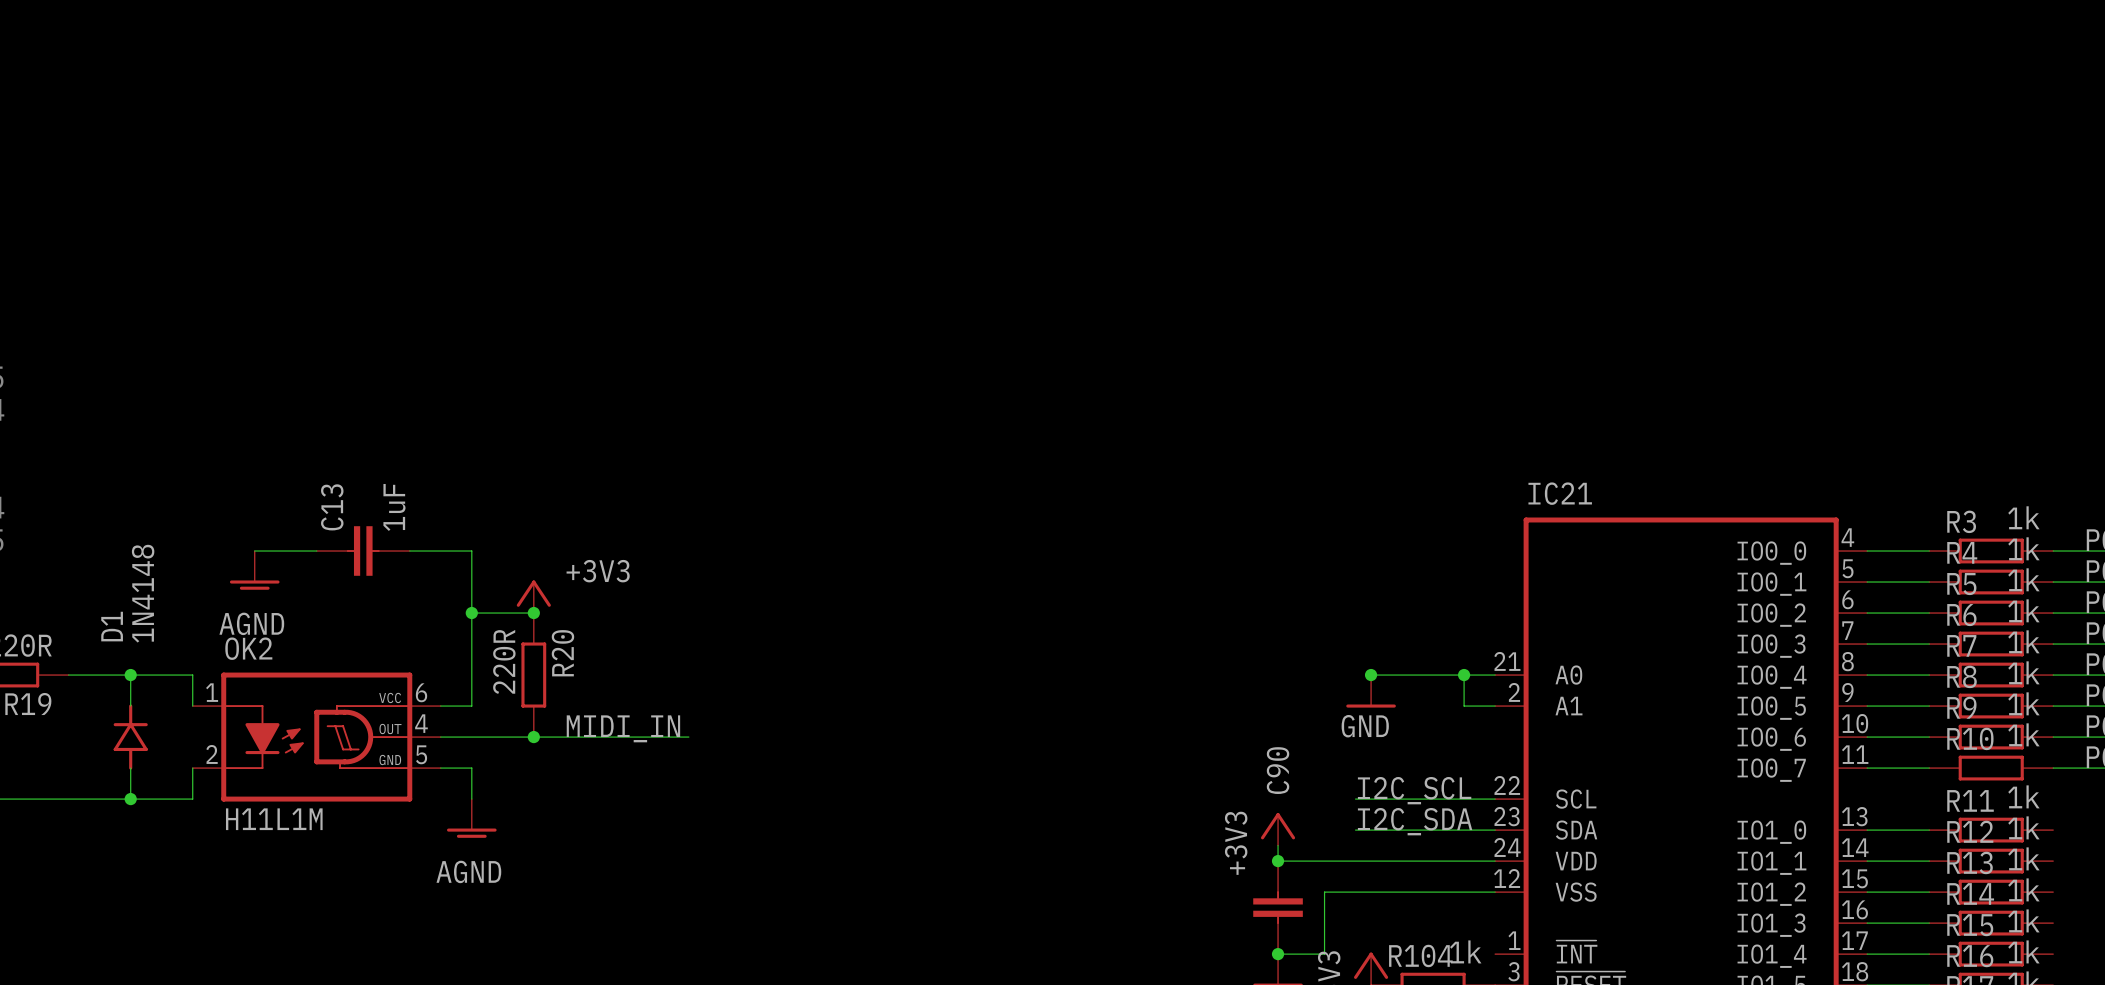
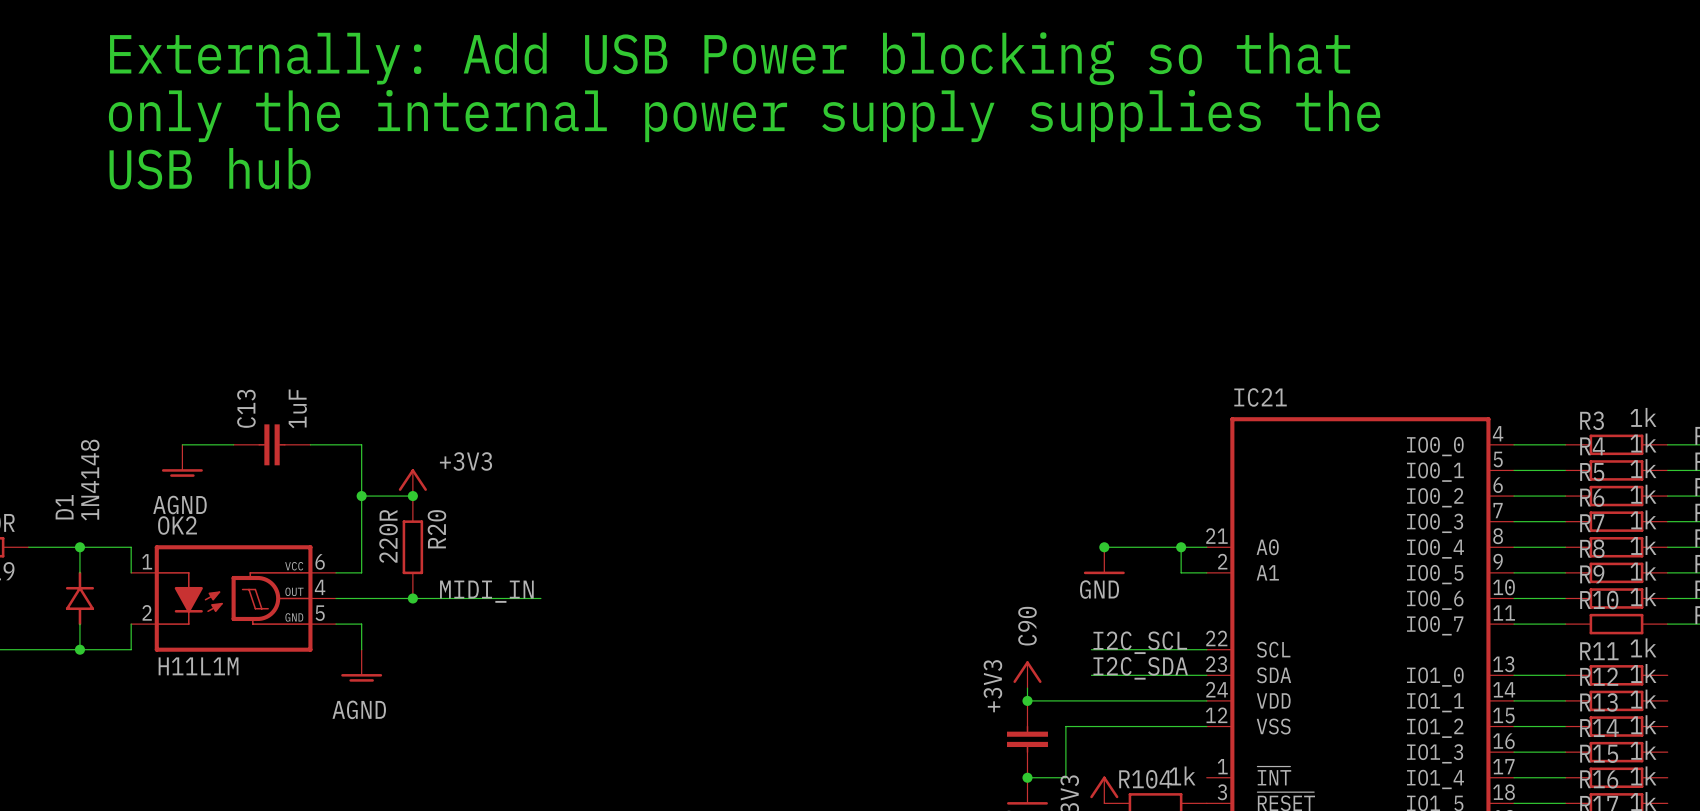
text: none -> Externally: Add USB Power blocking so that (730, 58)
text: none -> only the internal power supply supplies the (744, 116)
text: none -> USB hub (210, 168)

